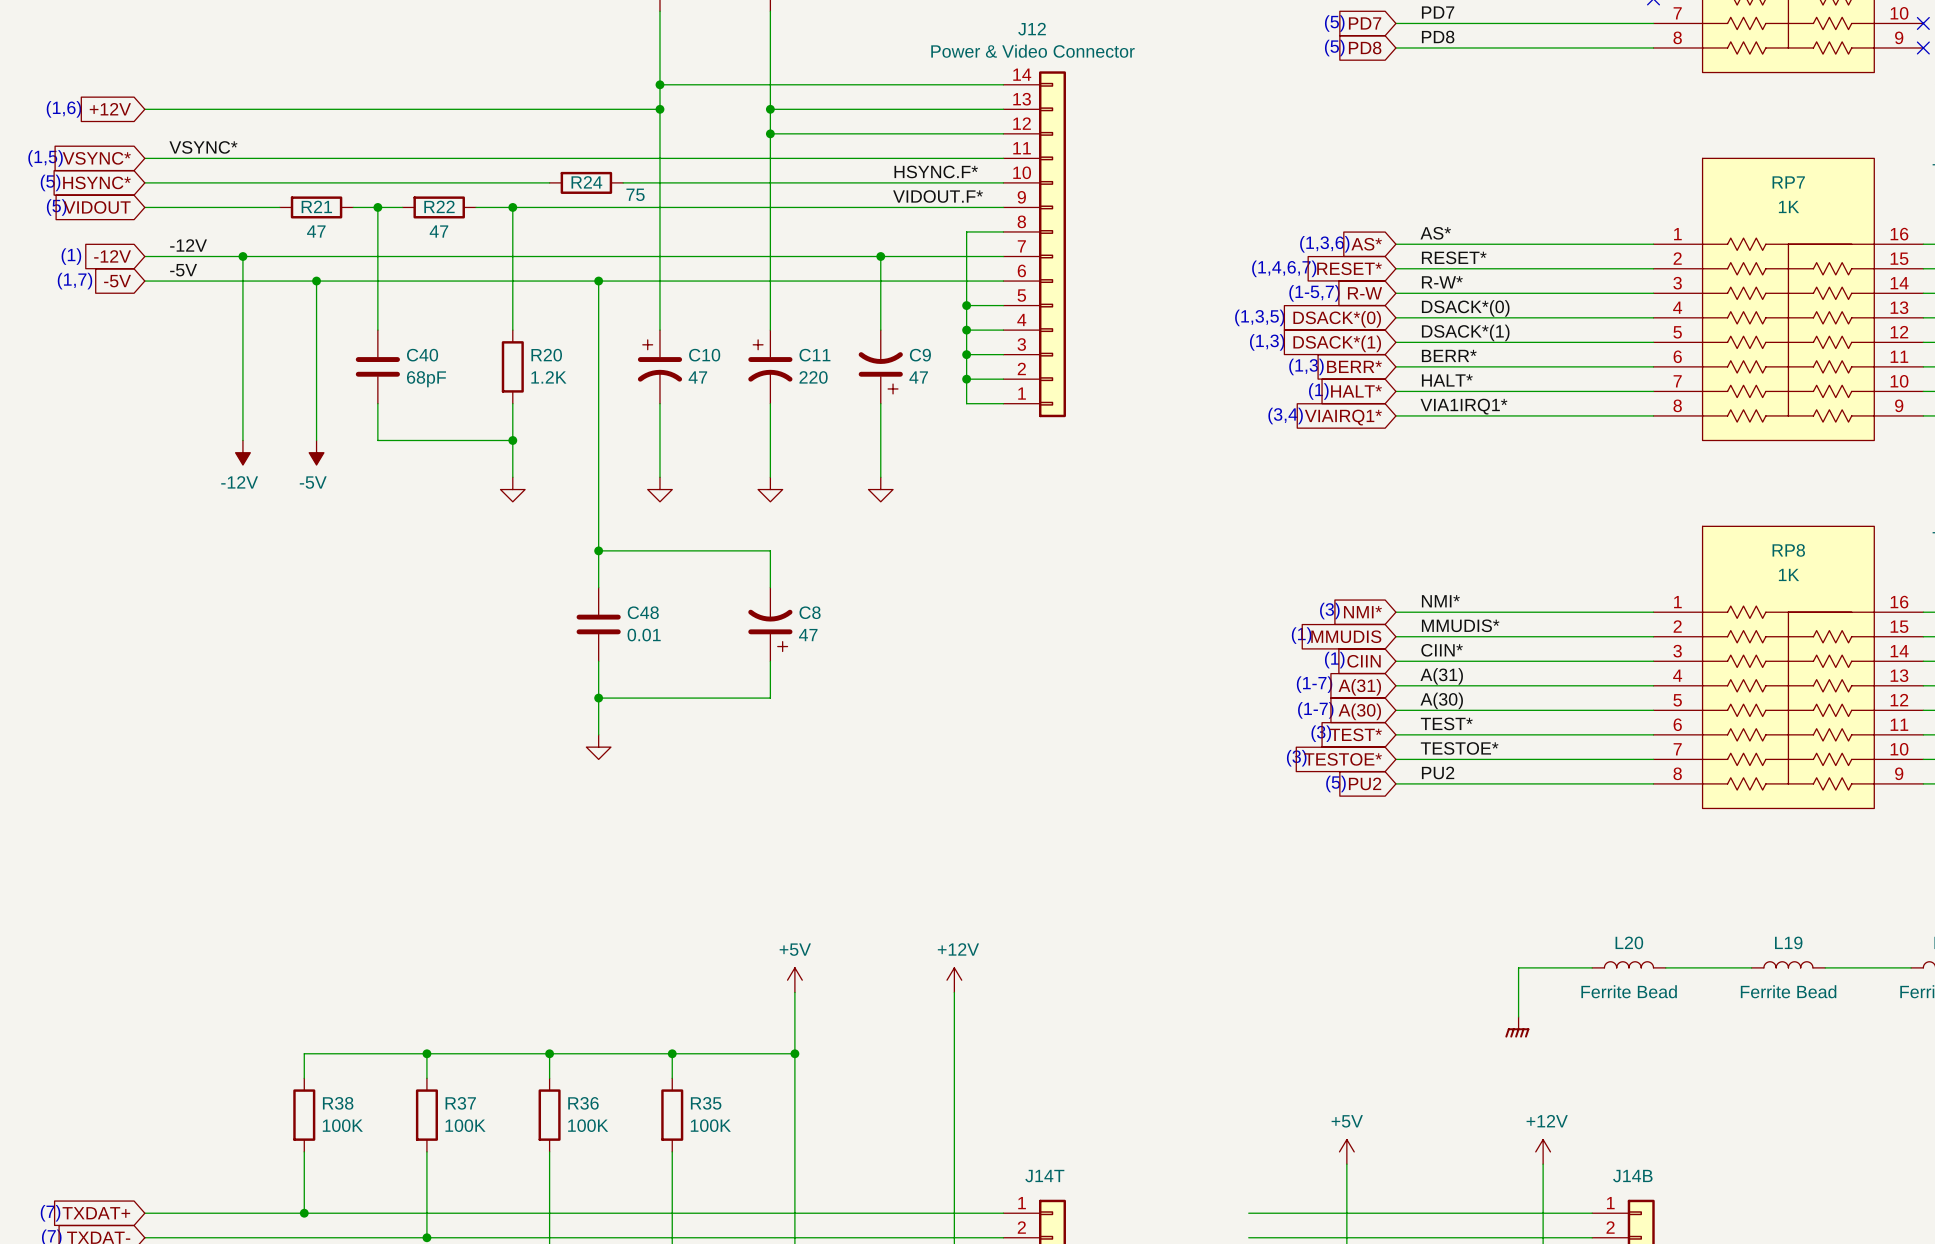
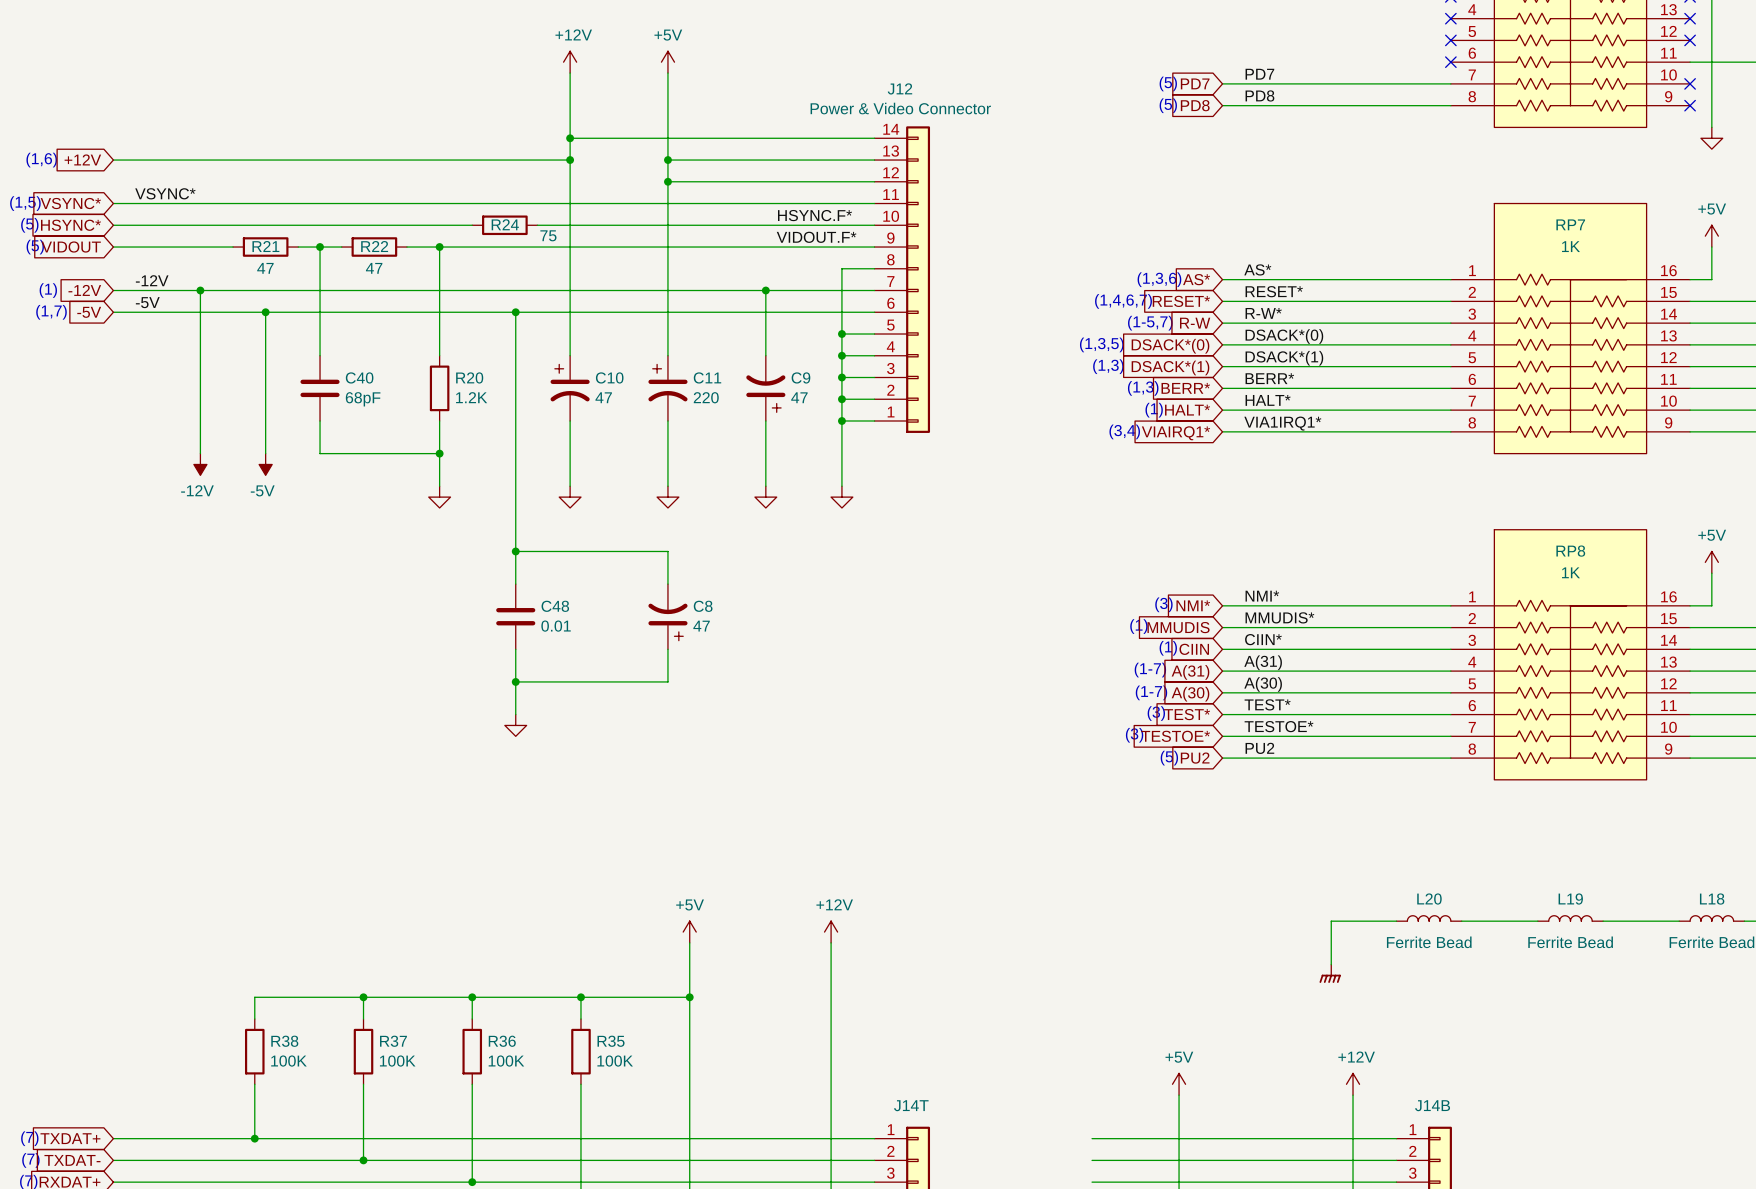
wire: none -> (841, 420) (841, 486)
junction: none -> (841, 420)
power symbol: none -> (841, 497)

